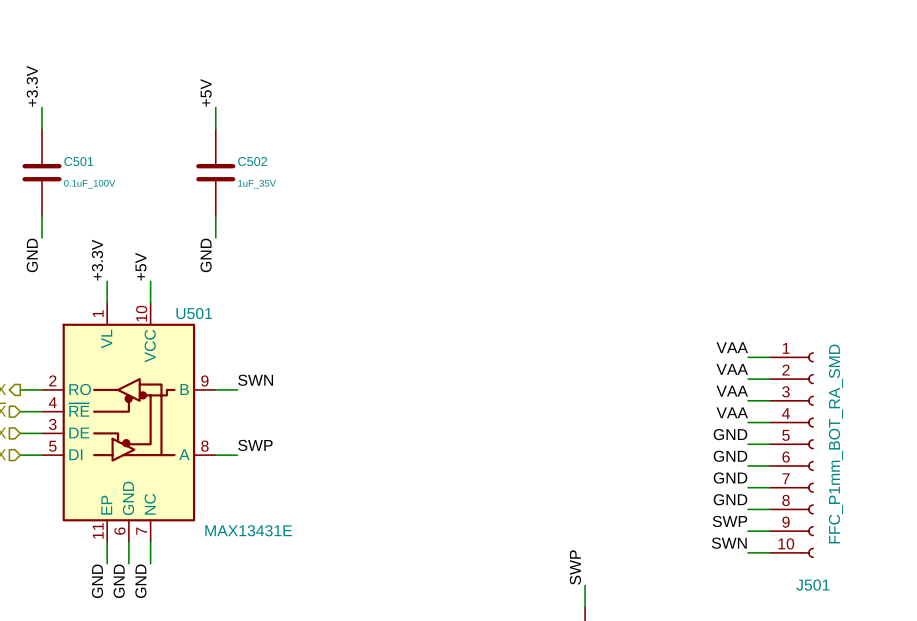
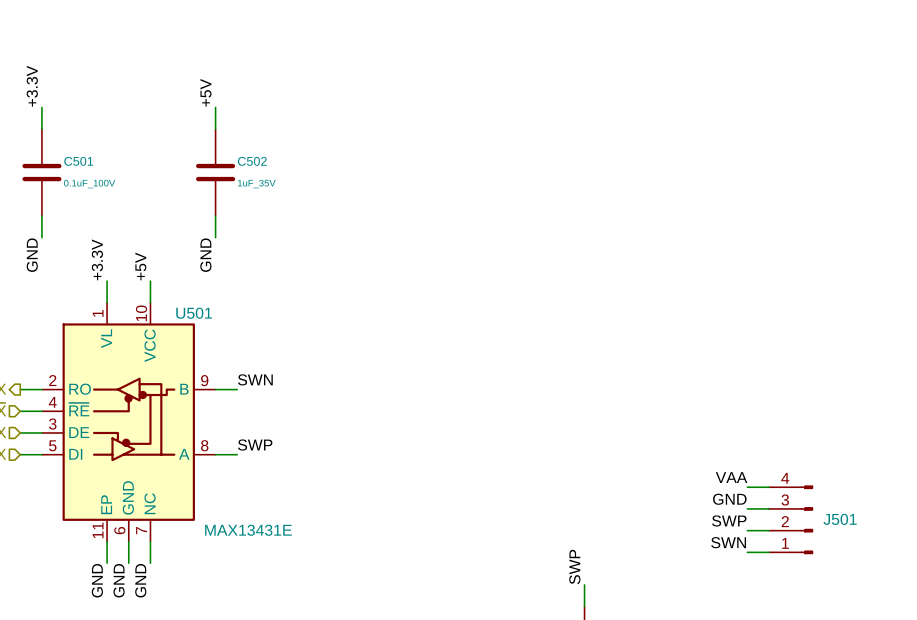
label: VAA (732, 347) -> none
J501 symbol: [769, 352, 814, 558] -> [769, 485, 814, 555]
wire: (748, 357) (769, 357) -> none
label: VAA (732, 369) -> none
wire: (748, 379) (769, 379) -> none
label: VAA (732, 391) -> none
wire: (748, 400) (769, 400) -> none
label: VAA (732, 412) -> none
wire: (748, 422) (769, 422) -> none
label: GND (730, 434) -> none
J501 value: FFC_P1mm_BOT_RA_SMD (835, 443) -> none
wire: (748, 444) (769, 444) -> none
label: GND (730, 456) -> none
wire: (748, 465) (769, 465) -> none
label: GND (730, 478) -> VAA (731, 477)
J501 name position: J501 (812, 585) -> J501 (840, 519)

